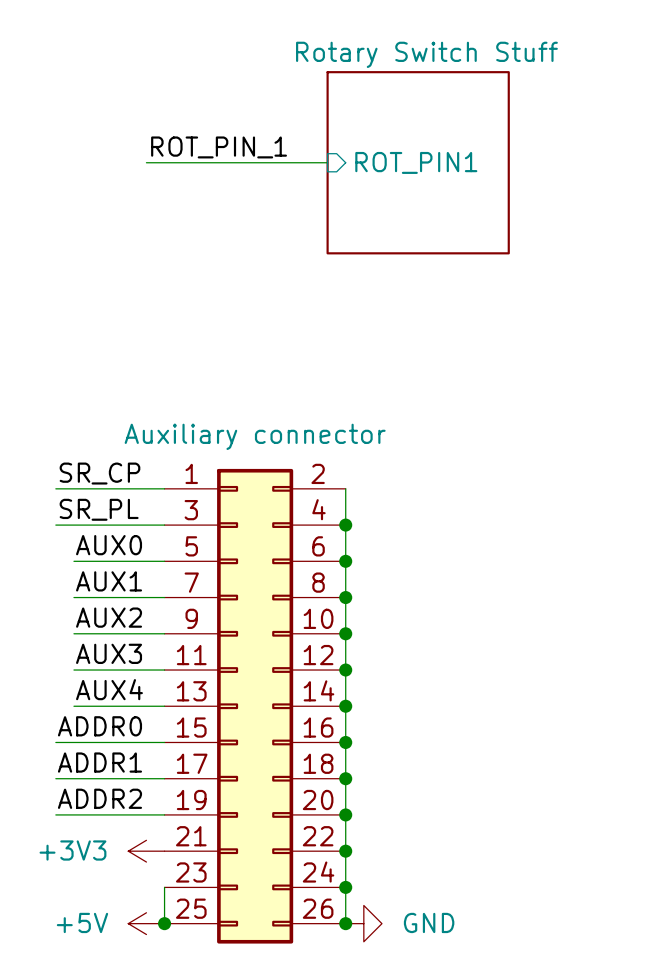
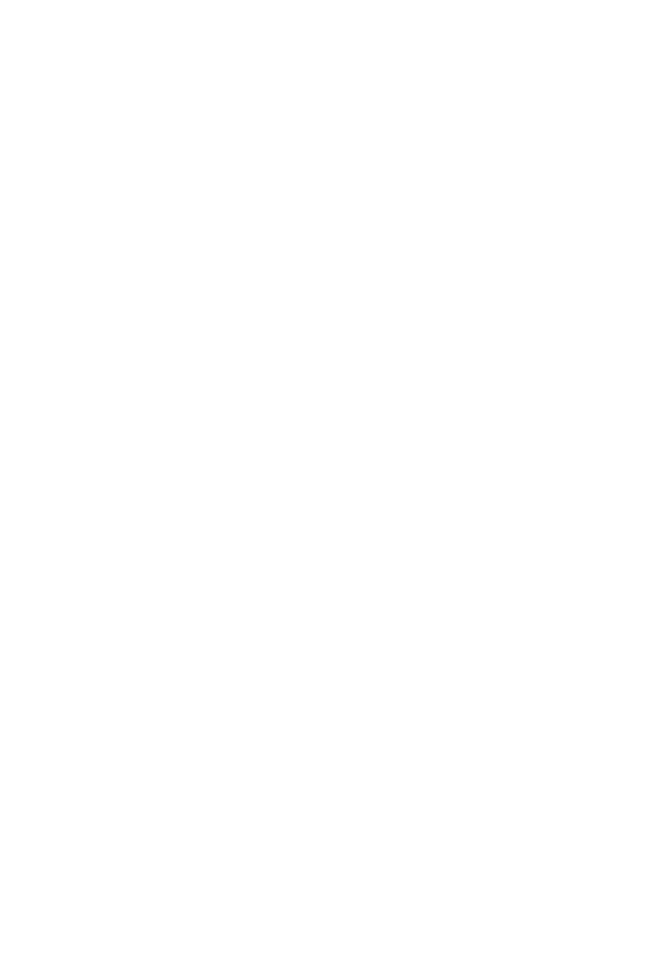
label: ROT_PIN_1 (219, 147) -> none
wire: (146, 162) (327, 162) -> none
sheet pin: ROT_PIN1 (416, 162) -> none
sheet Rotary Switch Stuff: (418, 162) -> none
label: SR_CP (99, 473) -> none
wire: (55, 488) (164, 488) -> none
wire: (345, 488) (345, 923) -> none
label: SR_PL (99, 509) -> none
wire: (55, 525) (164, 525) -> none
junction: (345, 525) -> none
label: AUX0 (109, 545) -> none
wire: (73, 561) (164, 561) -> none
junction: (345, 561) -> none
label: AUX1 (109, 581) -> none
wire: (73, 597) (164, 597) -> none
junction: (345, 597) -> none
label: AUX2 (109, 617) -> none
wire: (73, 633) (164, 633) -> none
junction: (345, 633) -> none
label: AUX3 (109, 653) -> none
wire: (73, 670) (164, 670) -> none
junction: (345, 670) -> none
label: AUX4 (109, 689) -> none
wire: (73, 706) (164, 706) -> none
part: Auxiliary connector (255, 706) -> none
junction: (345, 706) -> none
label: ADDR0 (99, 726) -> none
wire: (55, 742) (164, 742) -> none
junction: (345, 742) -> none
label: ADDR1 (99, 762) -> none
wire: (55, 778) (164, 778) -> none
junction: (345, 778) -> none
label: ADDR2 (99, 798) -> none
wire: (55, 814) (164, 814) -> none
junction: (345, 814) -> none
power symbol: +3V3 (146, 851) -> none
junction: (345, 851) -> none
wire: (164, 887) (164, 923) -> none
junction: (345, 887) -> none
power symbol: +5V (146, 923) -> none
junction: (164, 923) -> none
junction: (345, 923) -> none
power symbol: GND (363, 923) -> none

